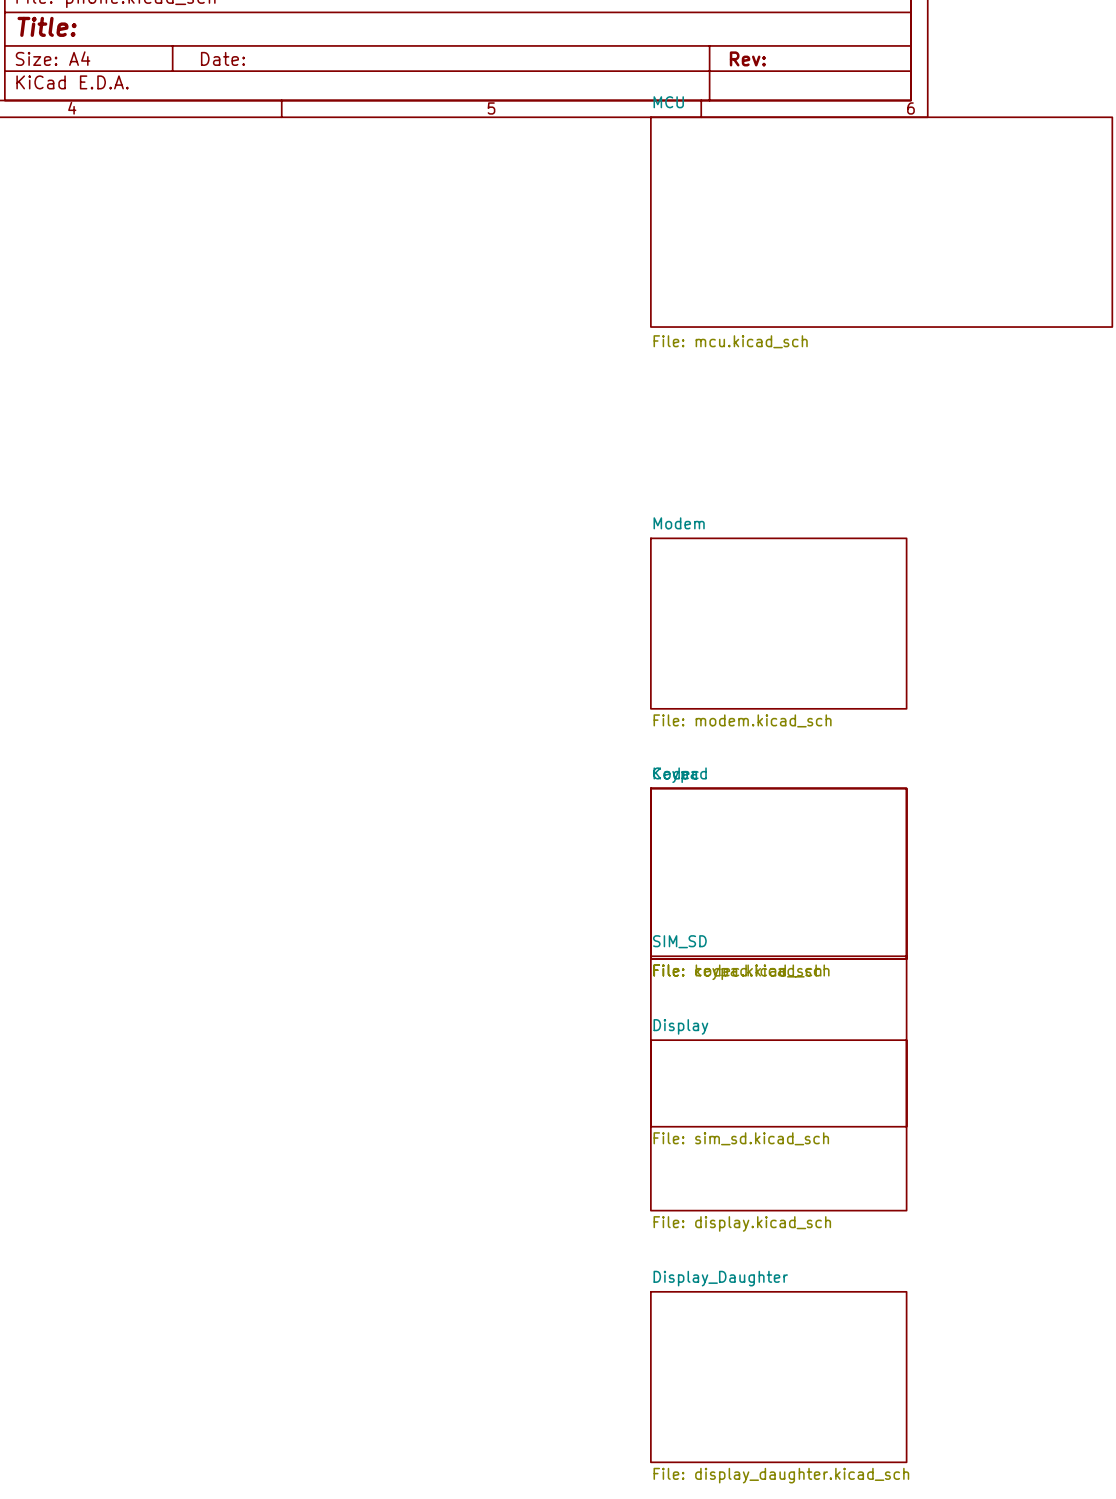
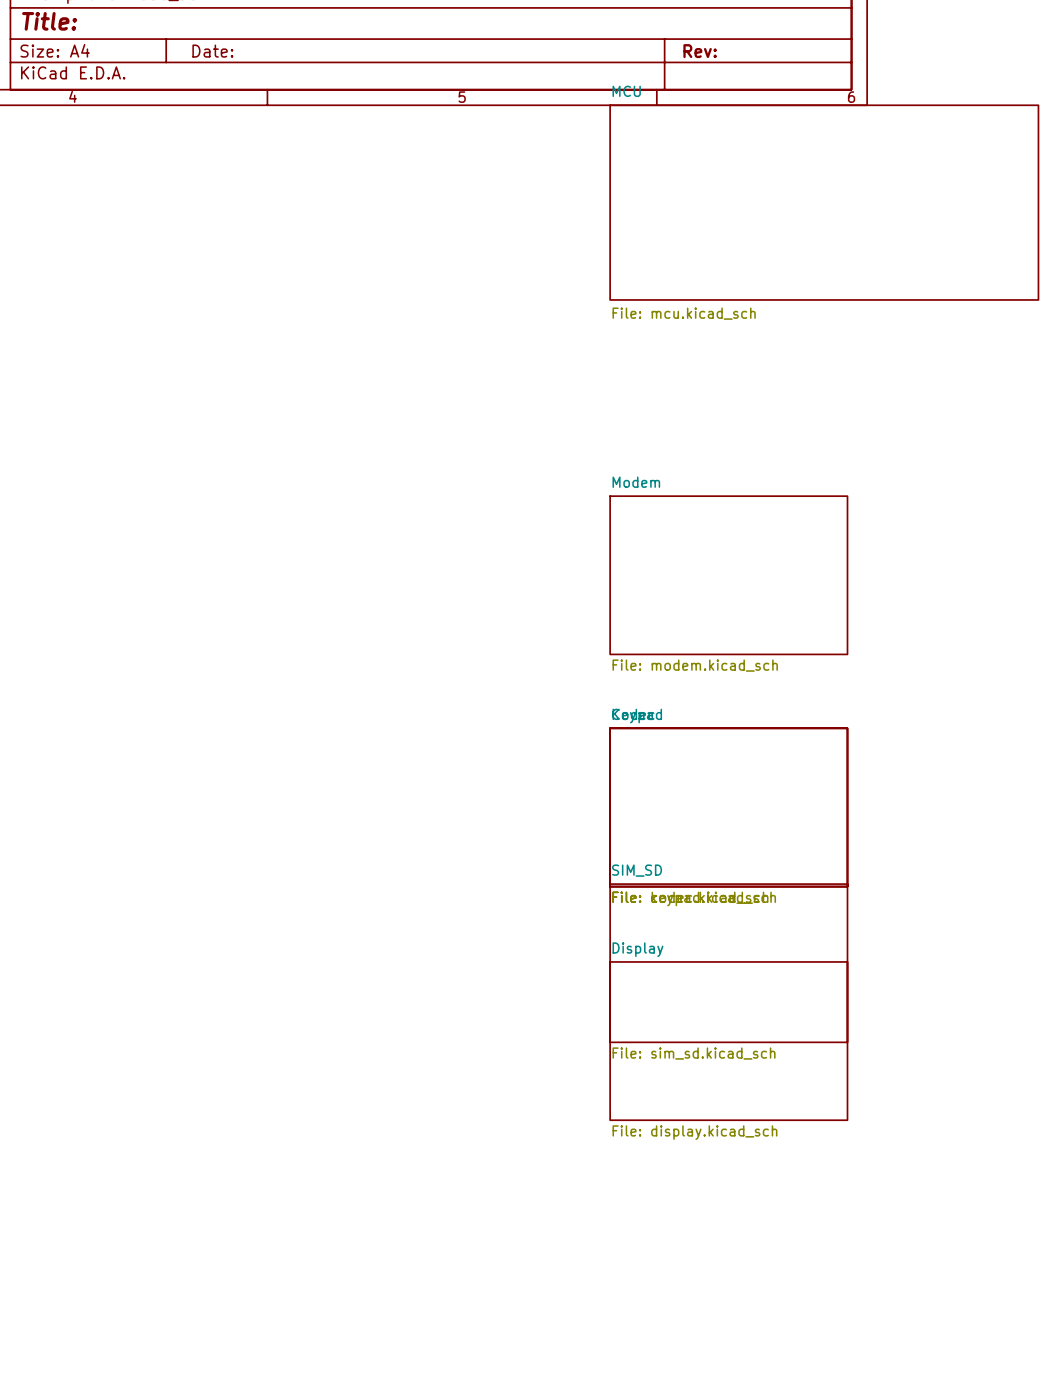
sheet Display_Daughter: File: display_daughter.kicad_sch (778, 1377) -> none

